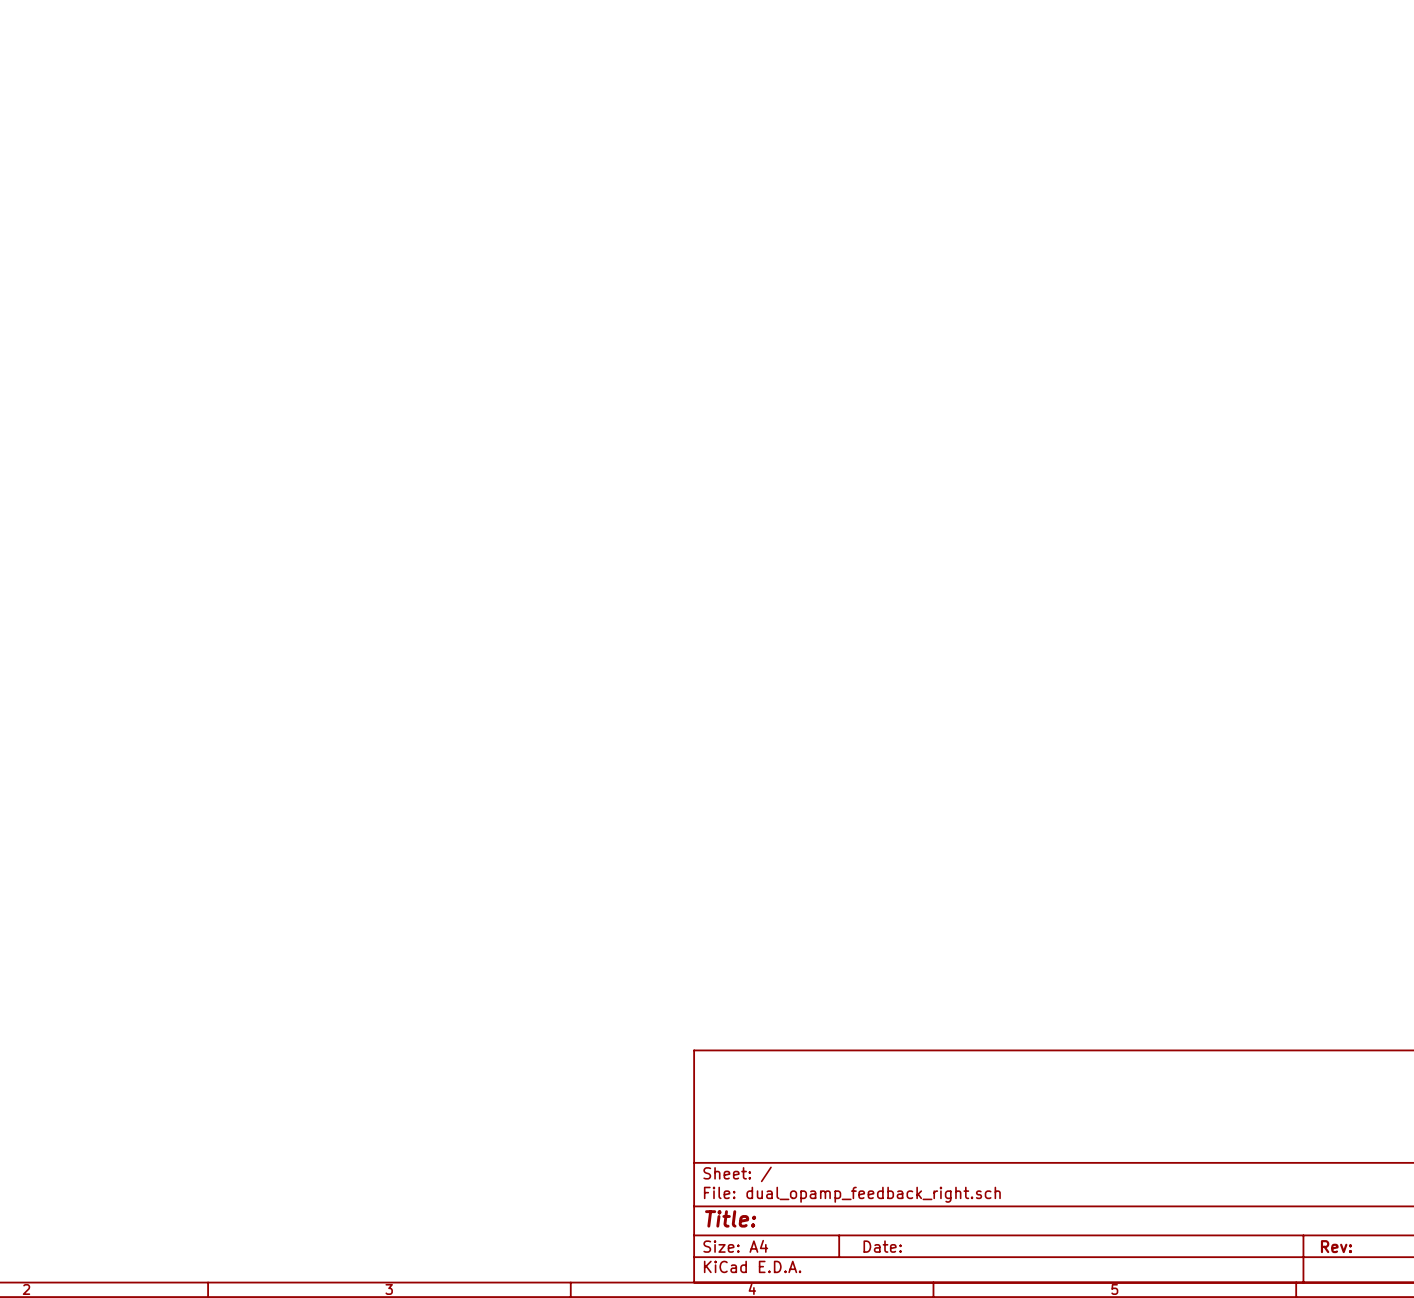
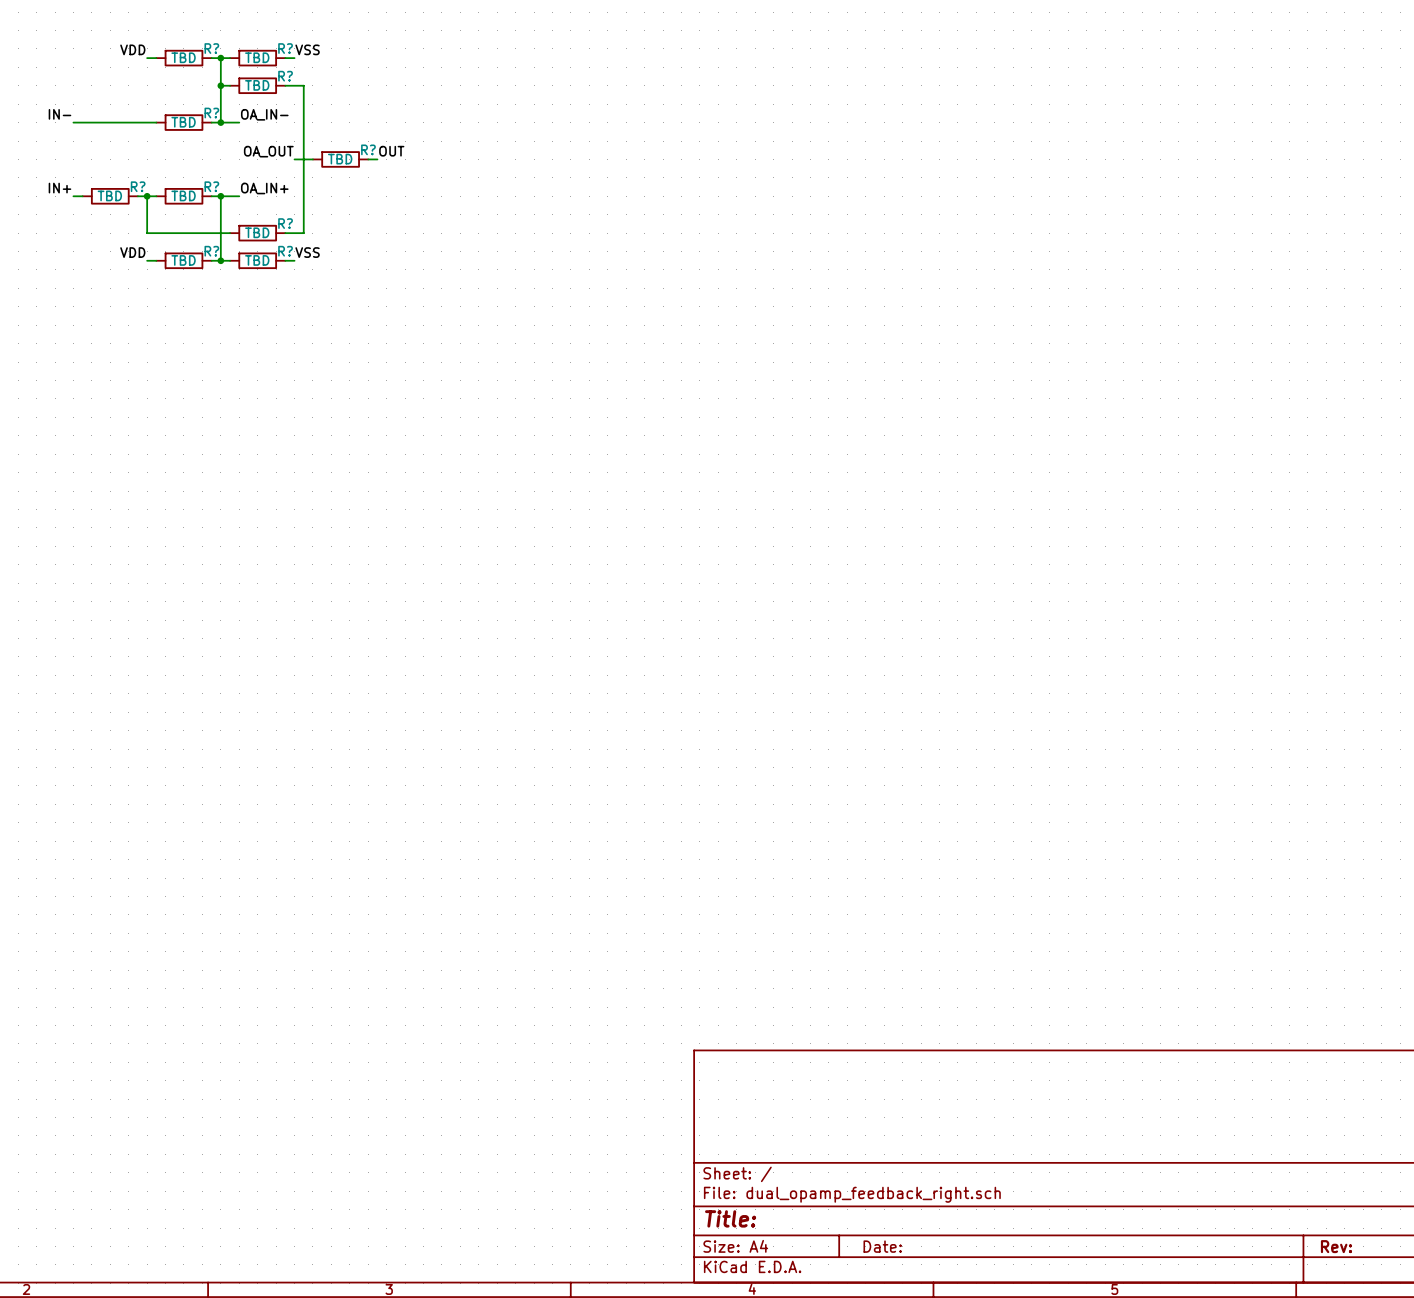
label: none -> VDD (132, 49)
label: none -> VSS (307, 49)
wire: none -> (147, 58) (156, 58)
R?: none -> TBD (183, 58)
wire: none -> (211, 58) (230, 58)
wire: none -> (220, 58) (220, 122)
junction: none -> (220, 58)
R?: none -> TBD (257, 58)
wire: none -> (285, 58) (294, 58)
wire: none -> (220, 85) (230, 85)
junction: none -> (220, 85)
R?: none -> TBD (257, 85)
wire: none -> (285, 85) (303, 85) (303, 233) (285, 233)
label: none -> IN- (59, 114)
label: none -> OA_IN- (264, 114)
wire: none -> (73, 122) (156, 122)
R?: none -> TBD (183, 122)
wire: none -> (211, 122) (239, 122)
junction: none -> (220, 122)
label: none -> OA_OUT (268, 151)
label: none -> OUT (391, 151)
wire: none -> (294, 159) (312, 159)
R?: none -> TBD (340, 159)
wire: none -> (368, 159) (377, 159)
label: none -> IN+ (59, 188)
label: none -> OA_IN+ (264, 188)
wire: none -> (73, 196) (82, 196)
R?: none -> TBD (110, 196)
wire: none -> (137, 196) (156, 196)
wire: none -> (147, 196) (147, 233) (230, 233)
junction: none -> (147, 196)
R?: none -> TBD (183, 196)
wire: none -> (211, 196) (239, 196)
wire: none -> (220, 196) (220, 260)
junction: none -> (220, 196)
R?: none -> TBD (257, 233)
label: none -> VDD (132, 252)
label: none -> VSS (307, 252)
wire: none -> (147, 260) (156, 260)
R?: none -> TBD (183, 260)
wire: none -> (211, 260) (230, 260)
junction: none -> (220, 260)
R?: none -> TBD (257, 260)
wire: none -> (285, 260) (294, 260)

